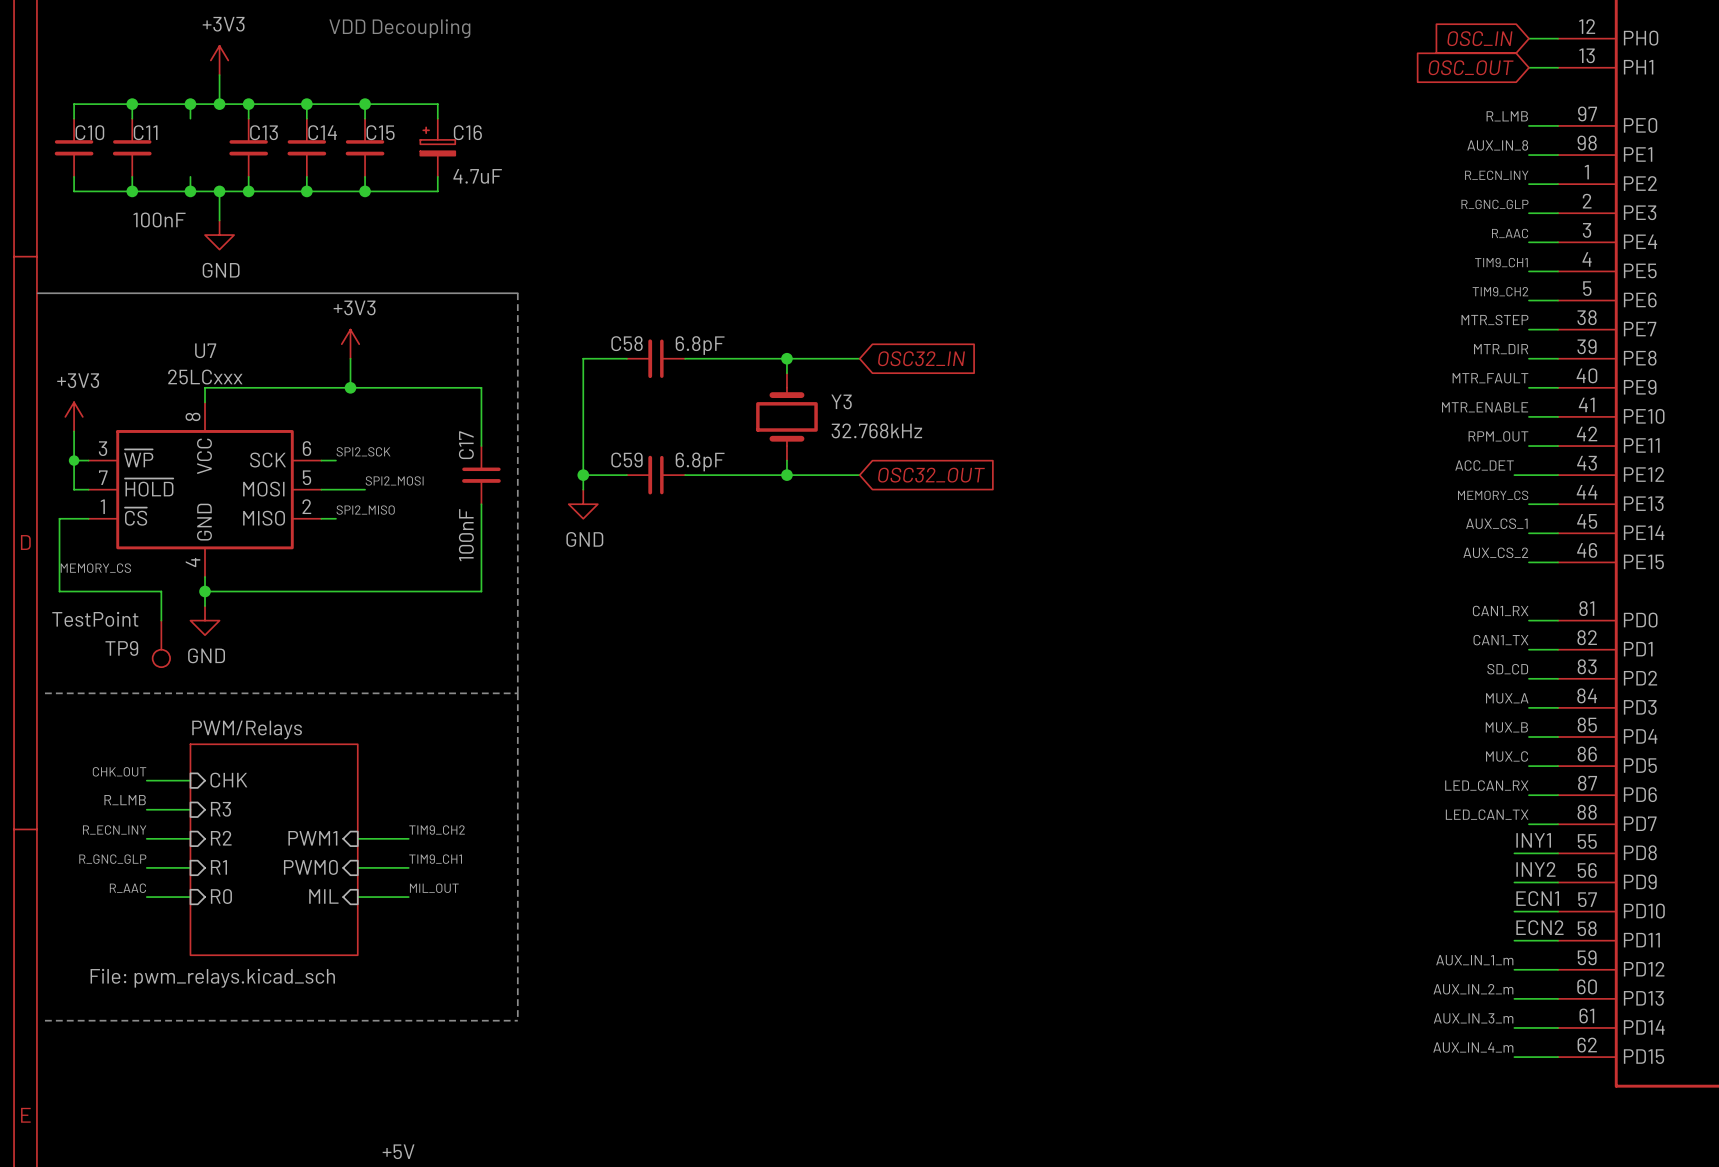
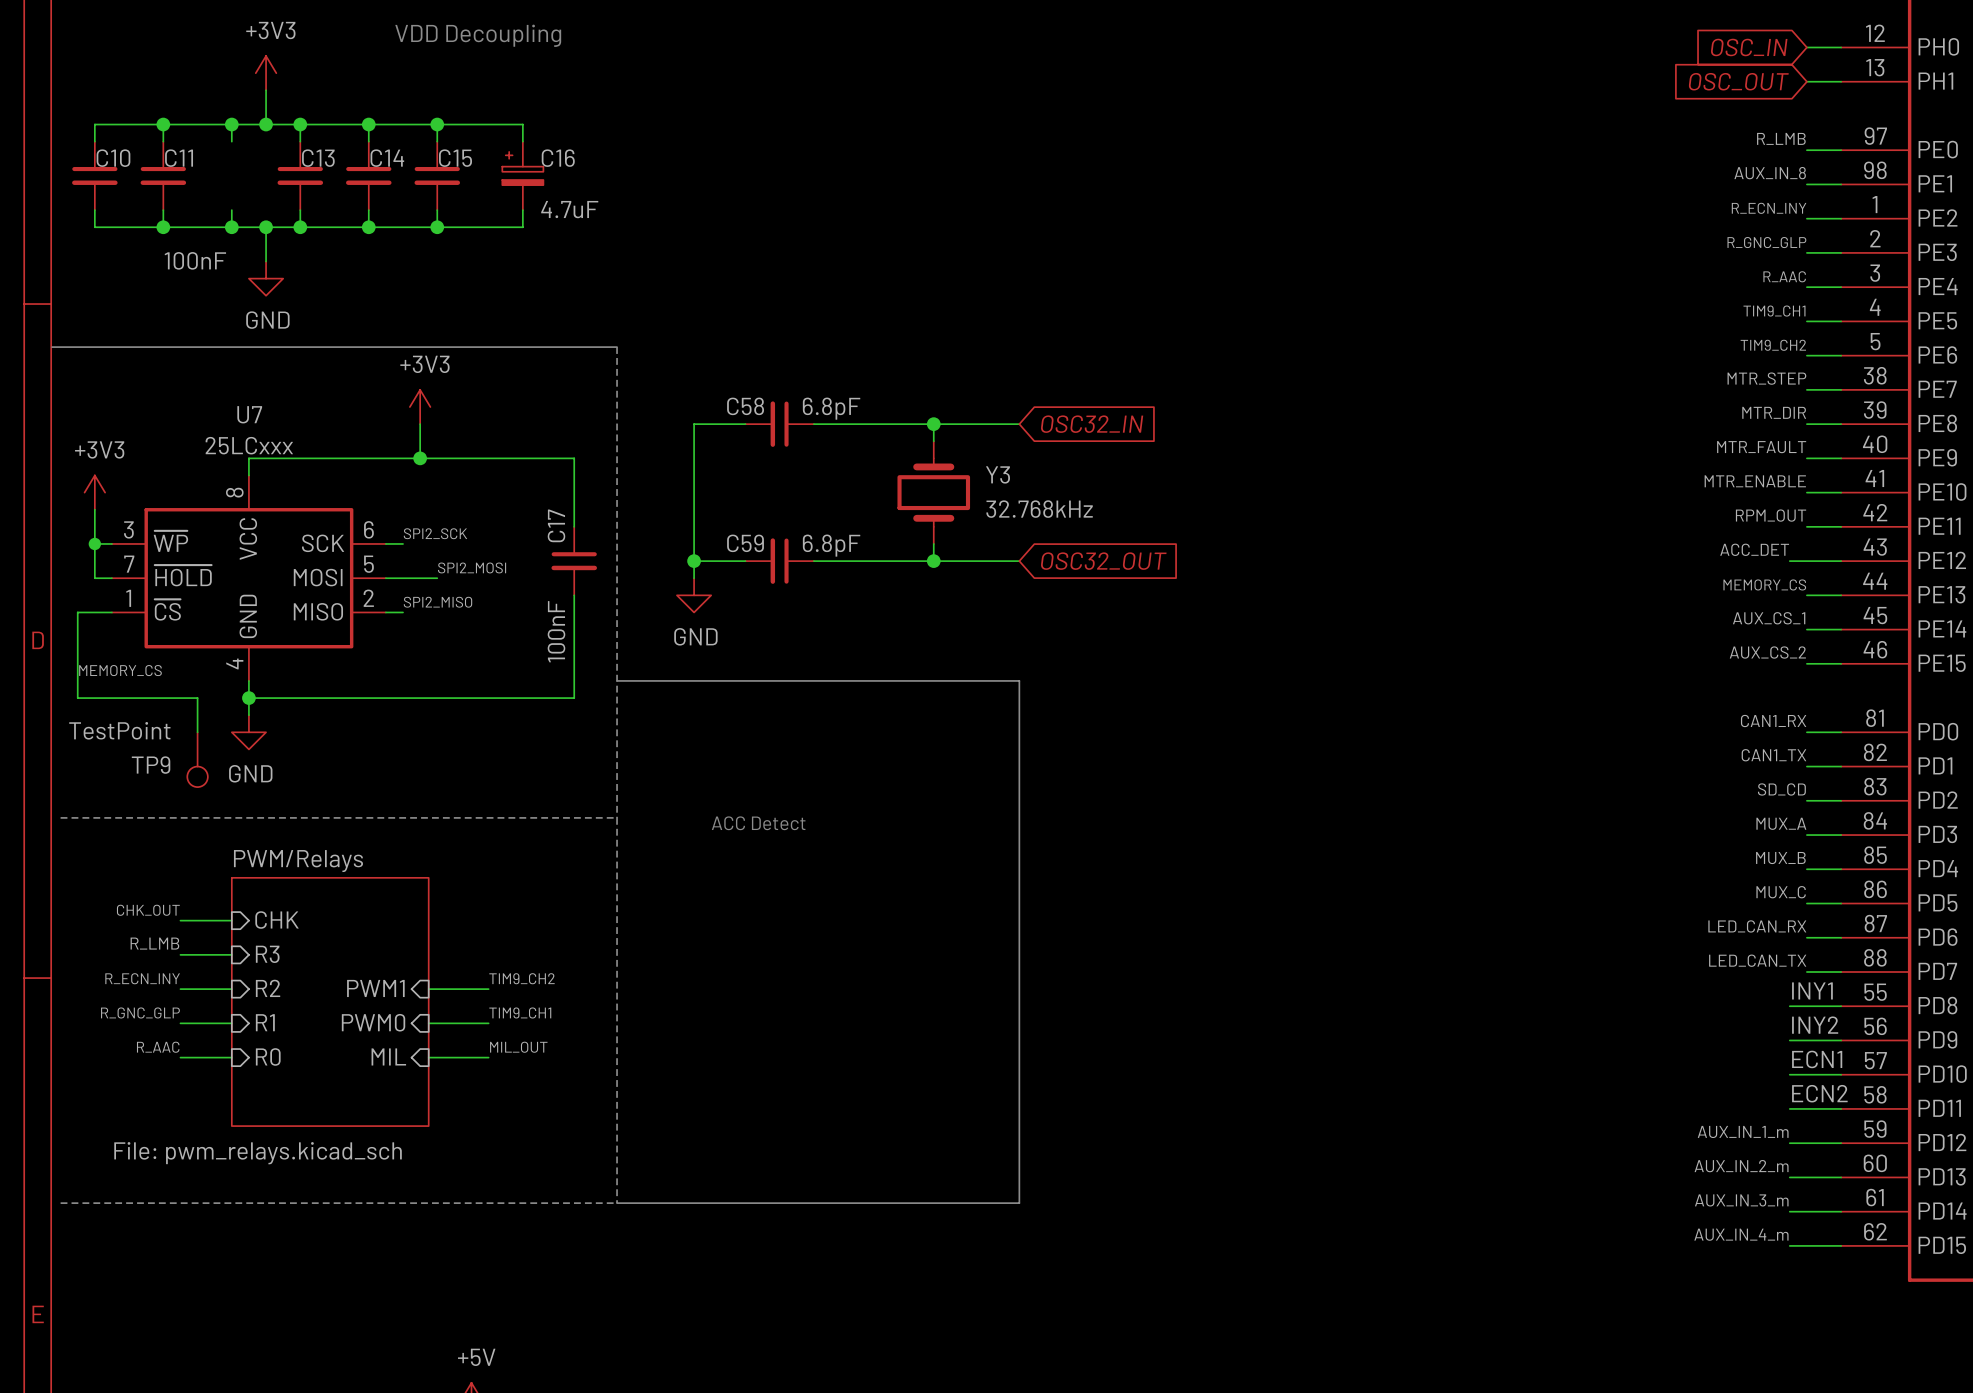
line: none -> (617, 680) (1019, 680) (1019, 1203) (617, 1203)
text: none -> ACC Detect (758, 823)

